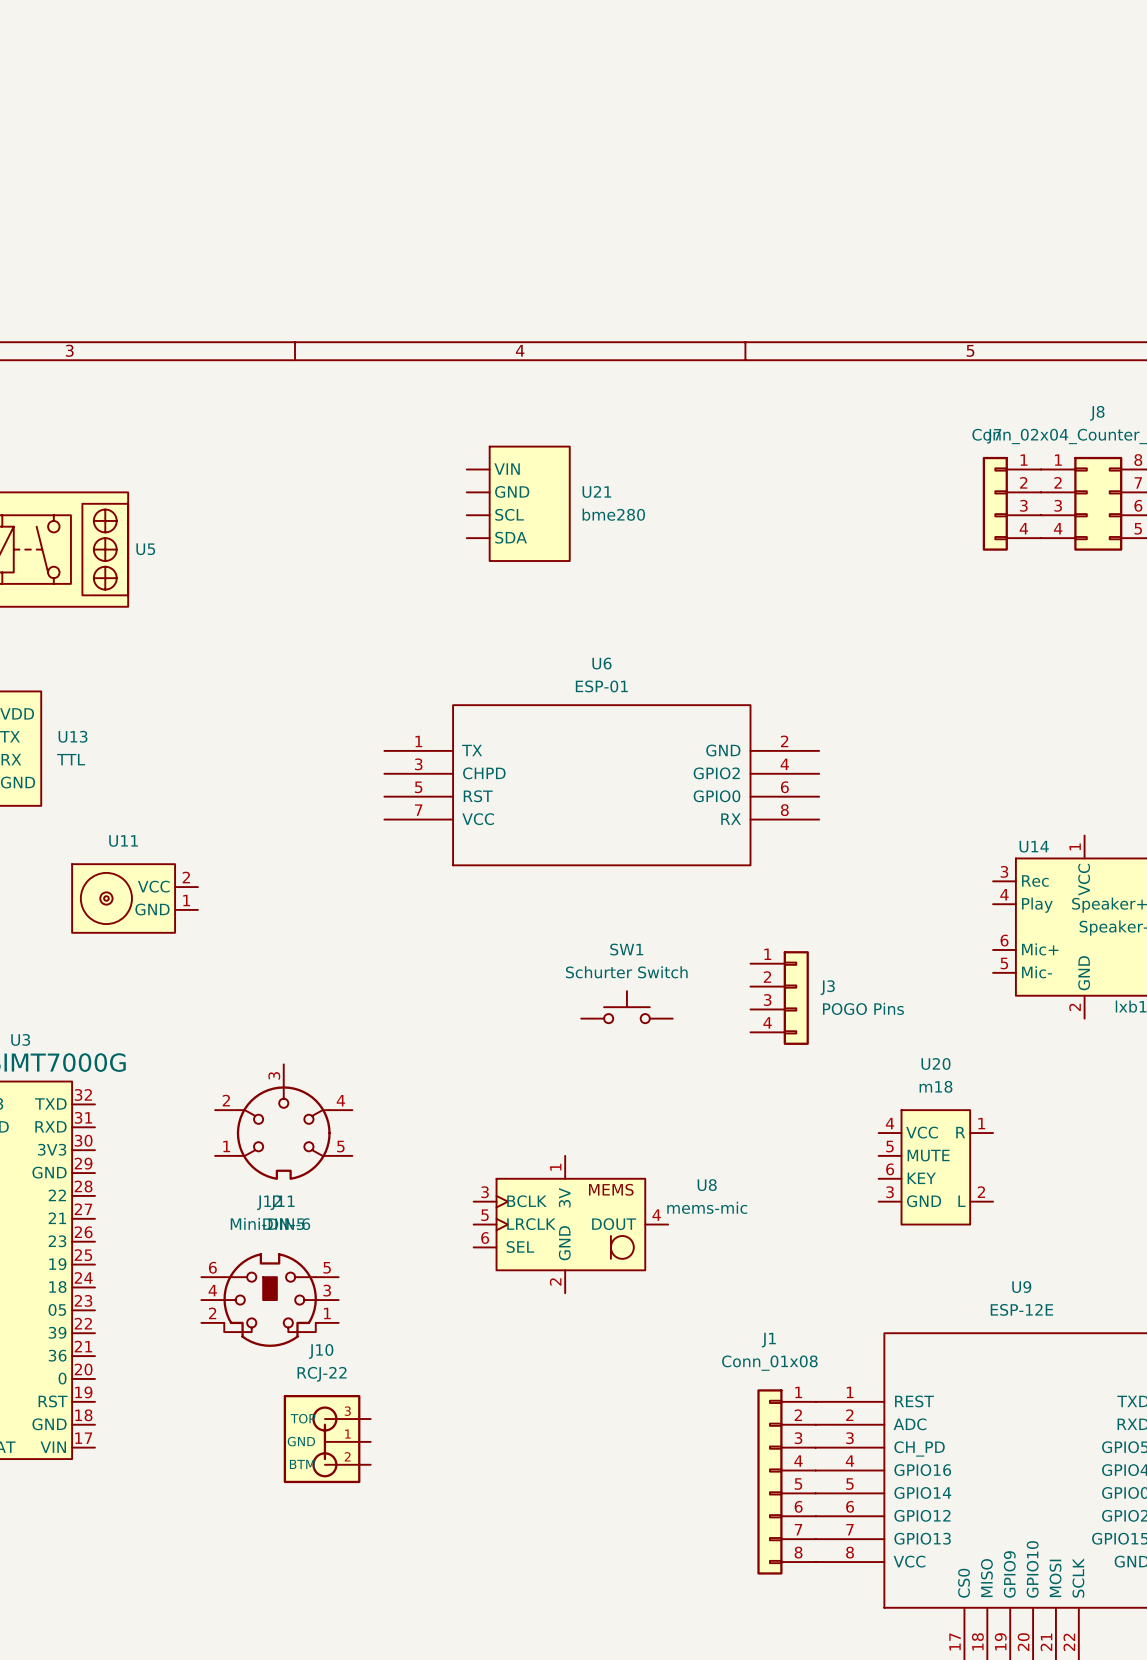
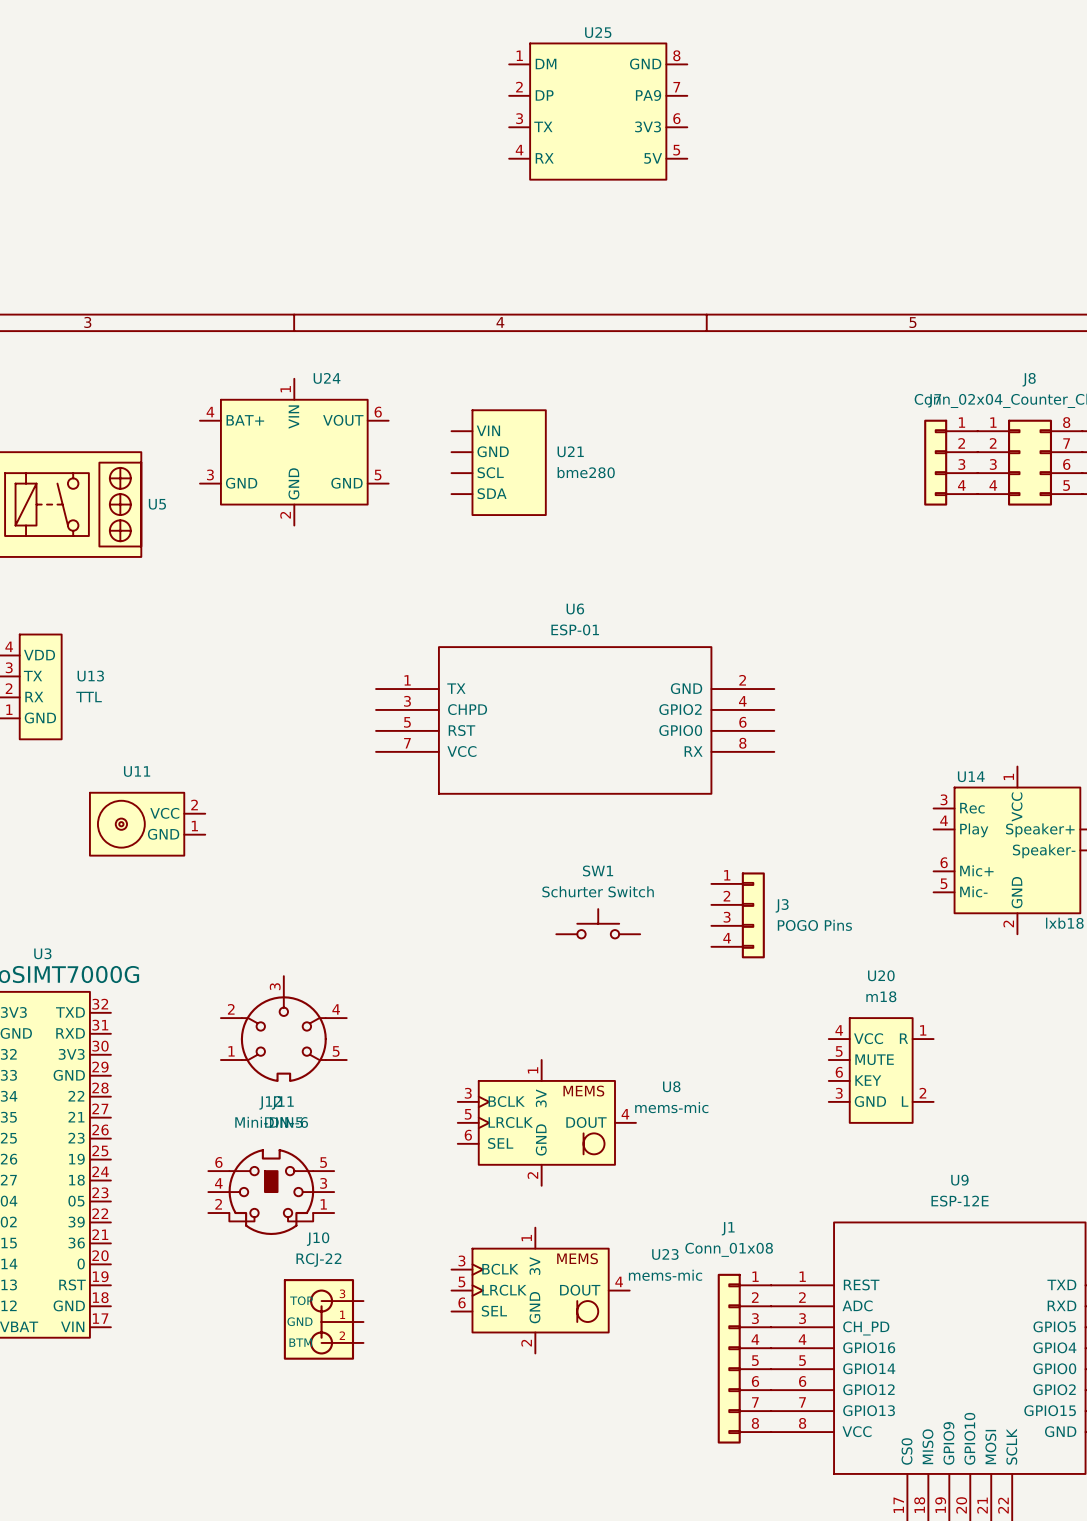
U25: none -> (598, 111)
U24: none -> (294, 452)
U23: none -> mems-mic (540, 1290)

